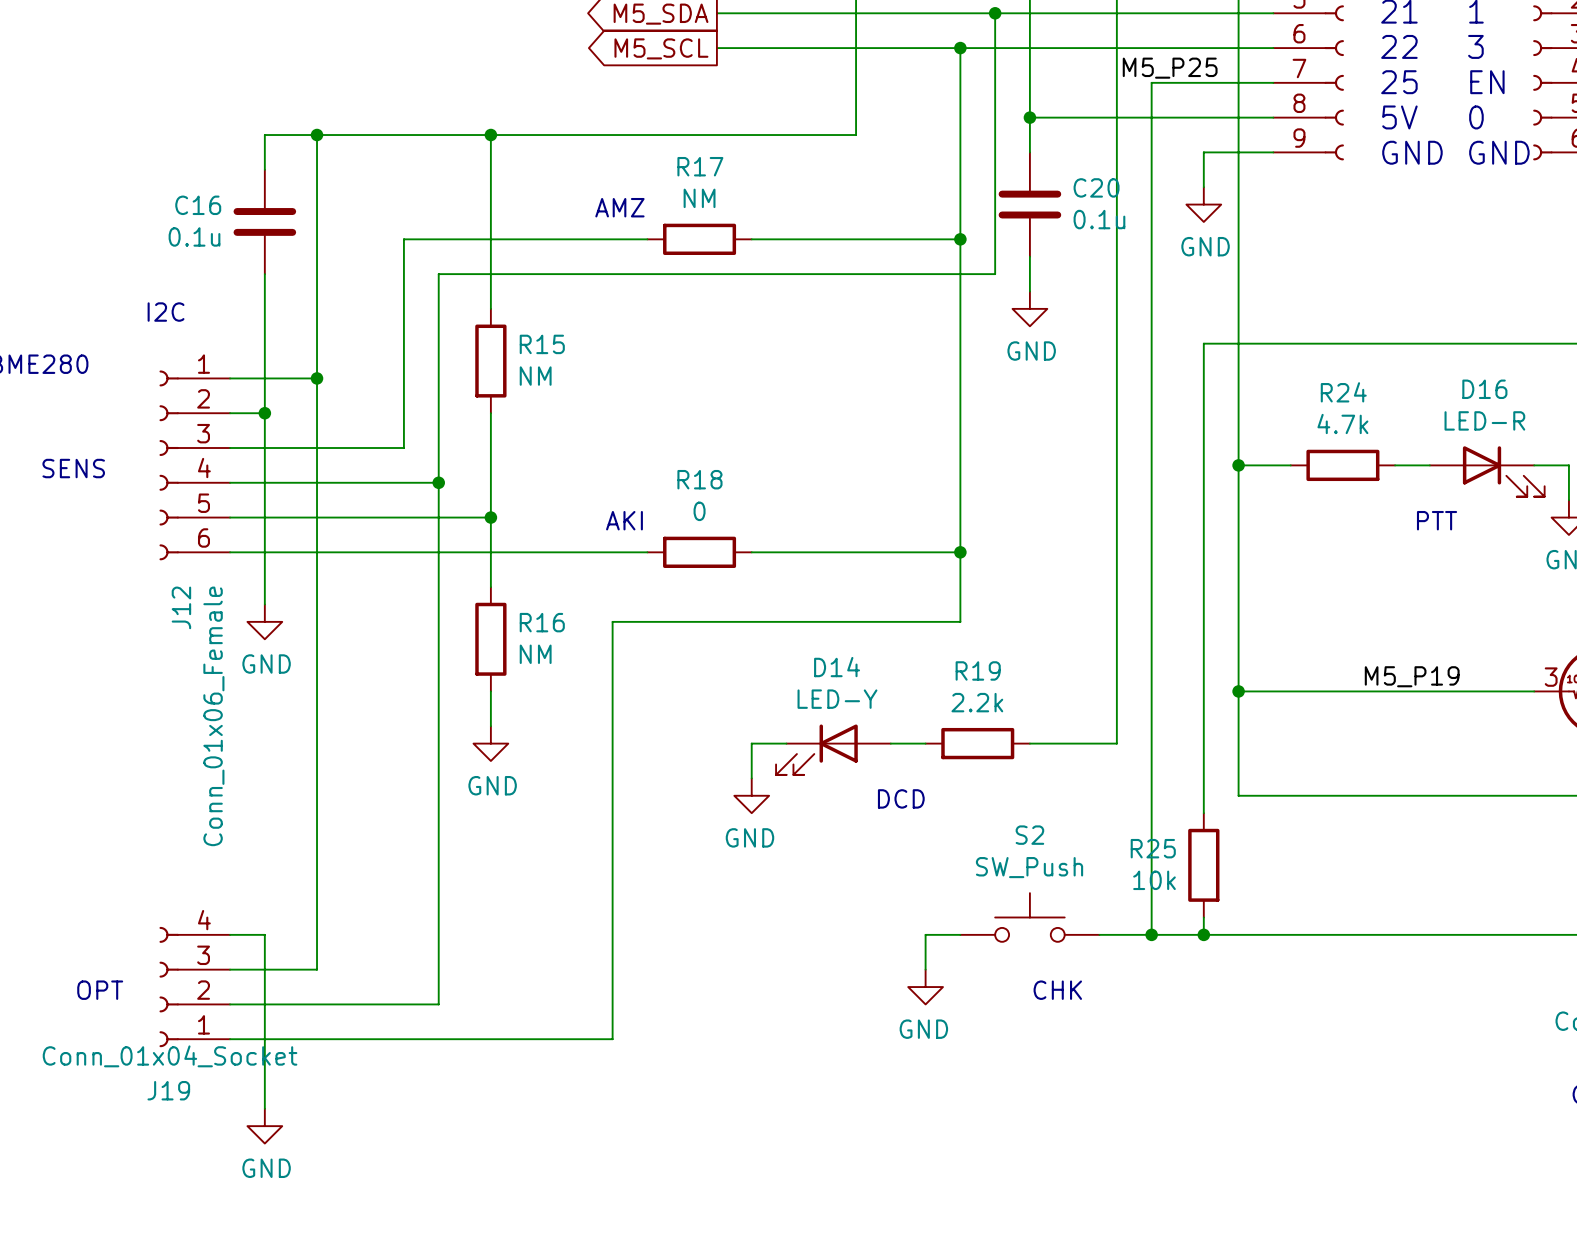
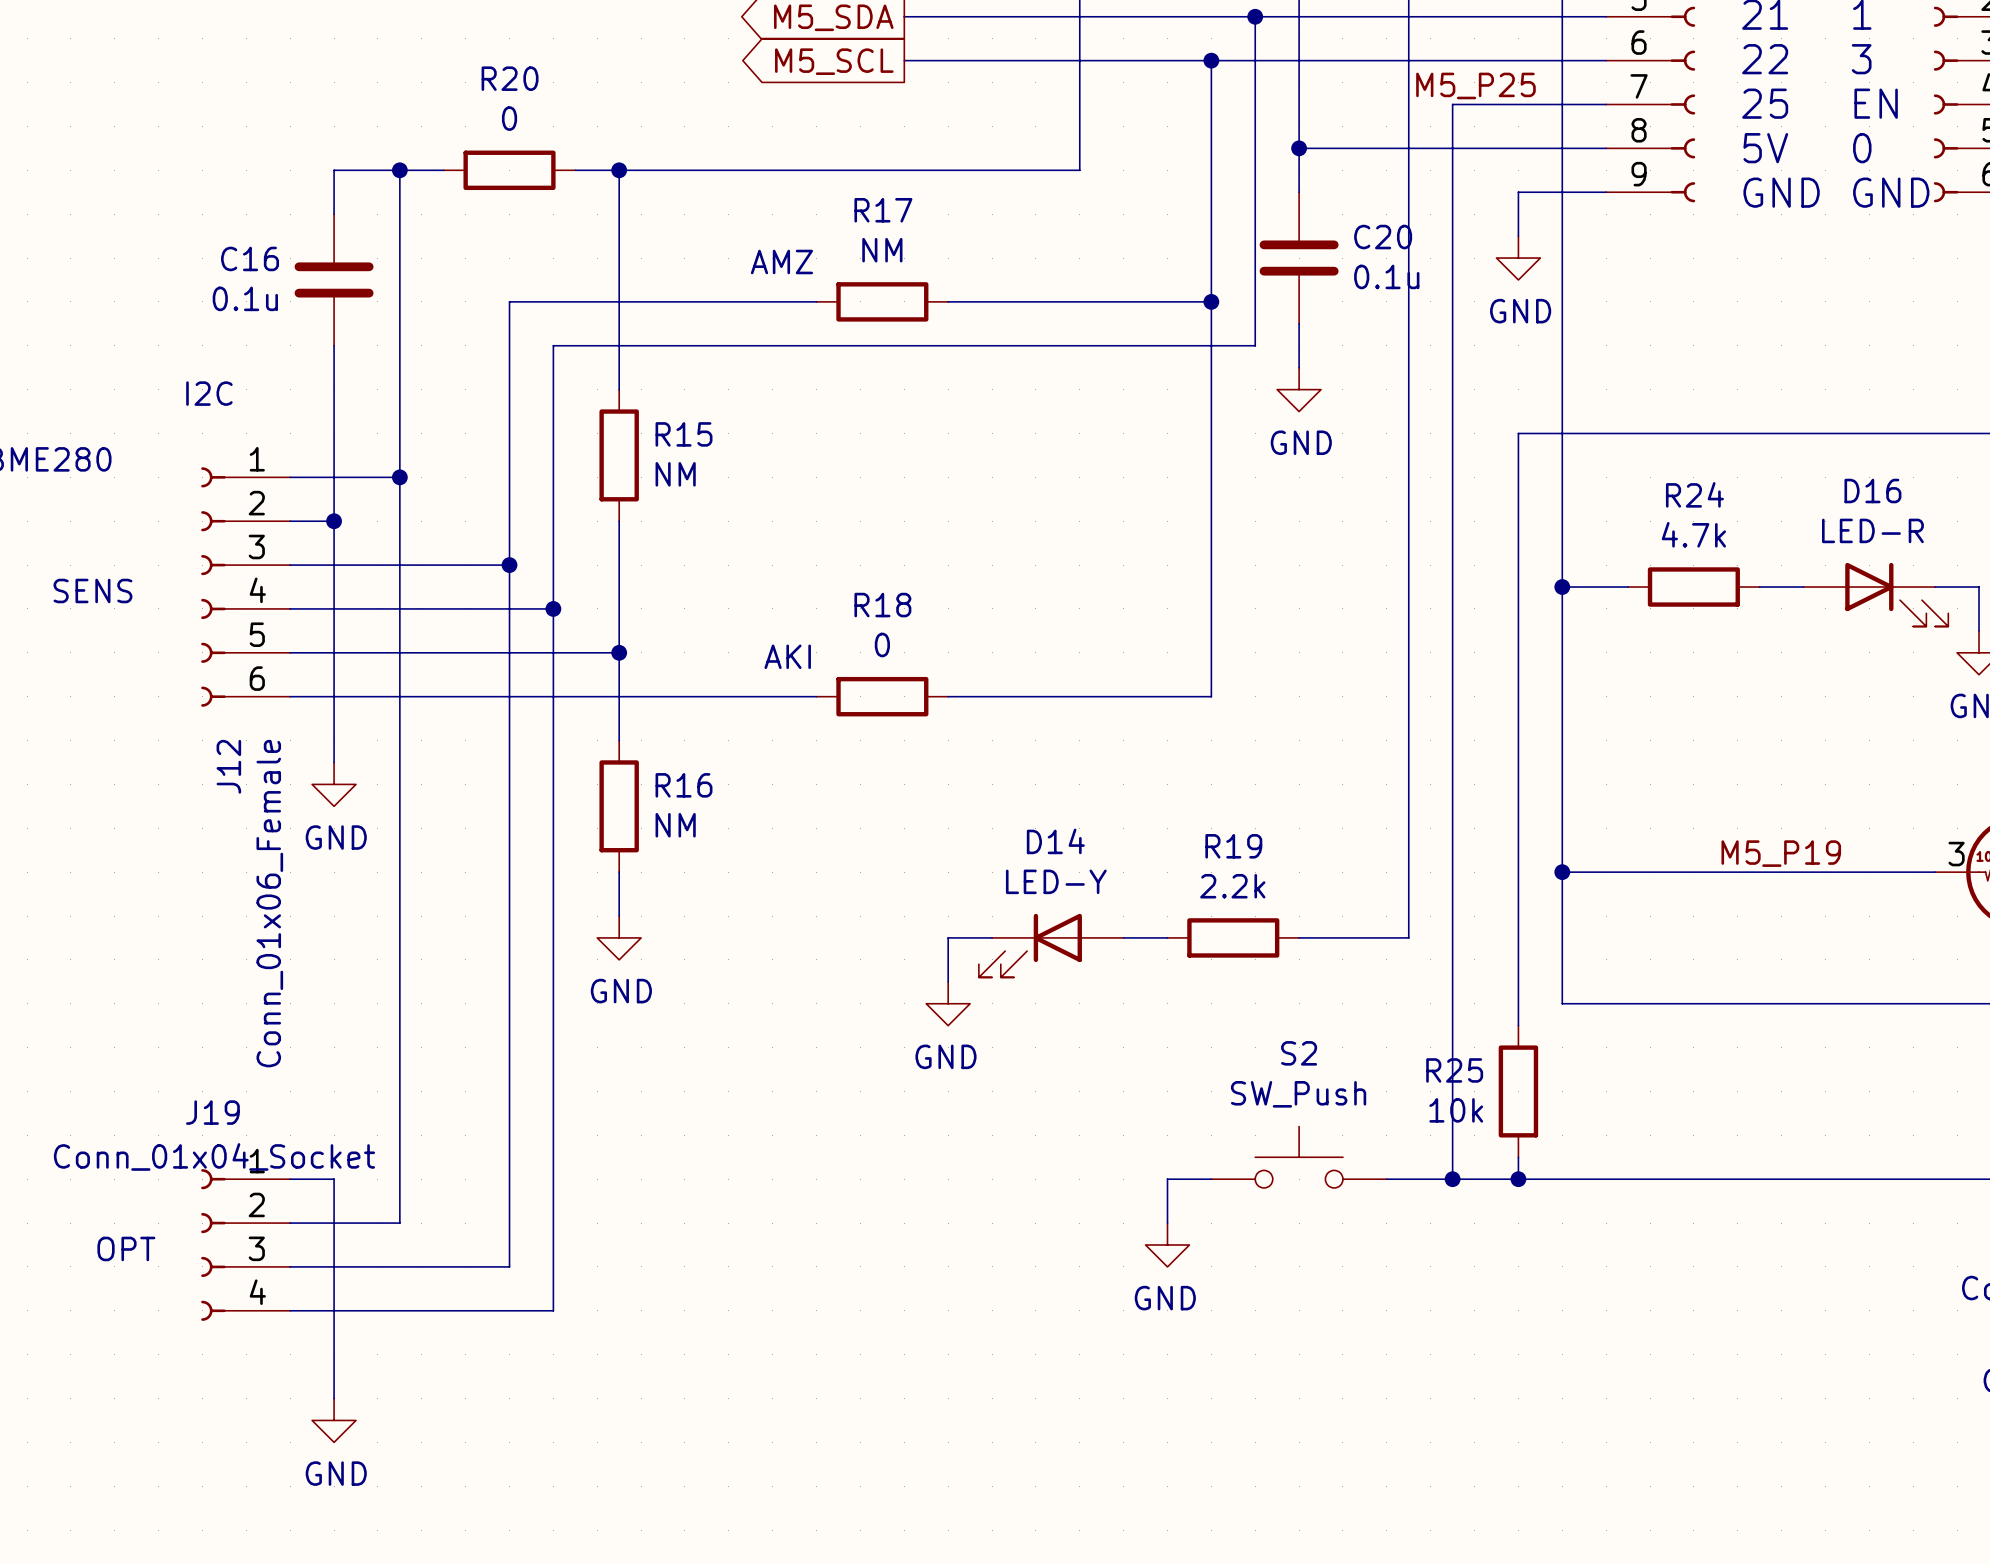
wire: (351, 135) (456, 135) -> none
R20: none -> 0 (509, 170)
wire: none -> (509, 565) (509, 1266)
junction: none -> (509, 565)
text: PTT (1437, 520) -> none
wire: (960, 552) (960, 621) (612, 621) (612, 1039) (438, 1039) -> none
junction: (960, 552) -> none
text: DCD (901, 798) -> none
J19 flip: as is (169, 987) -> up-down (213, 1244)
text: CHK (1057, 990) -> none
wire: (403, 1004) (438, 1004) -> (553, 1310) (553, 1266)

